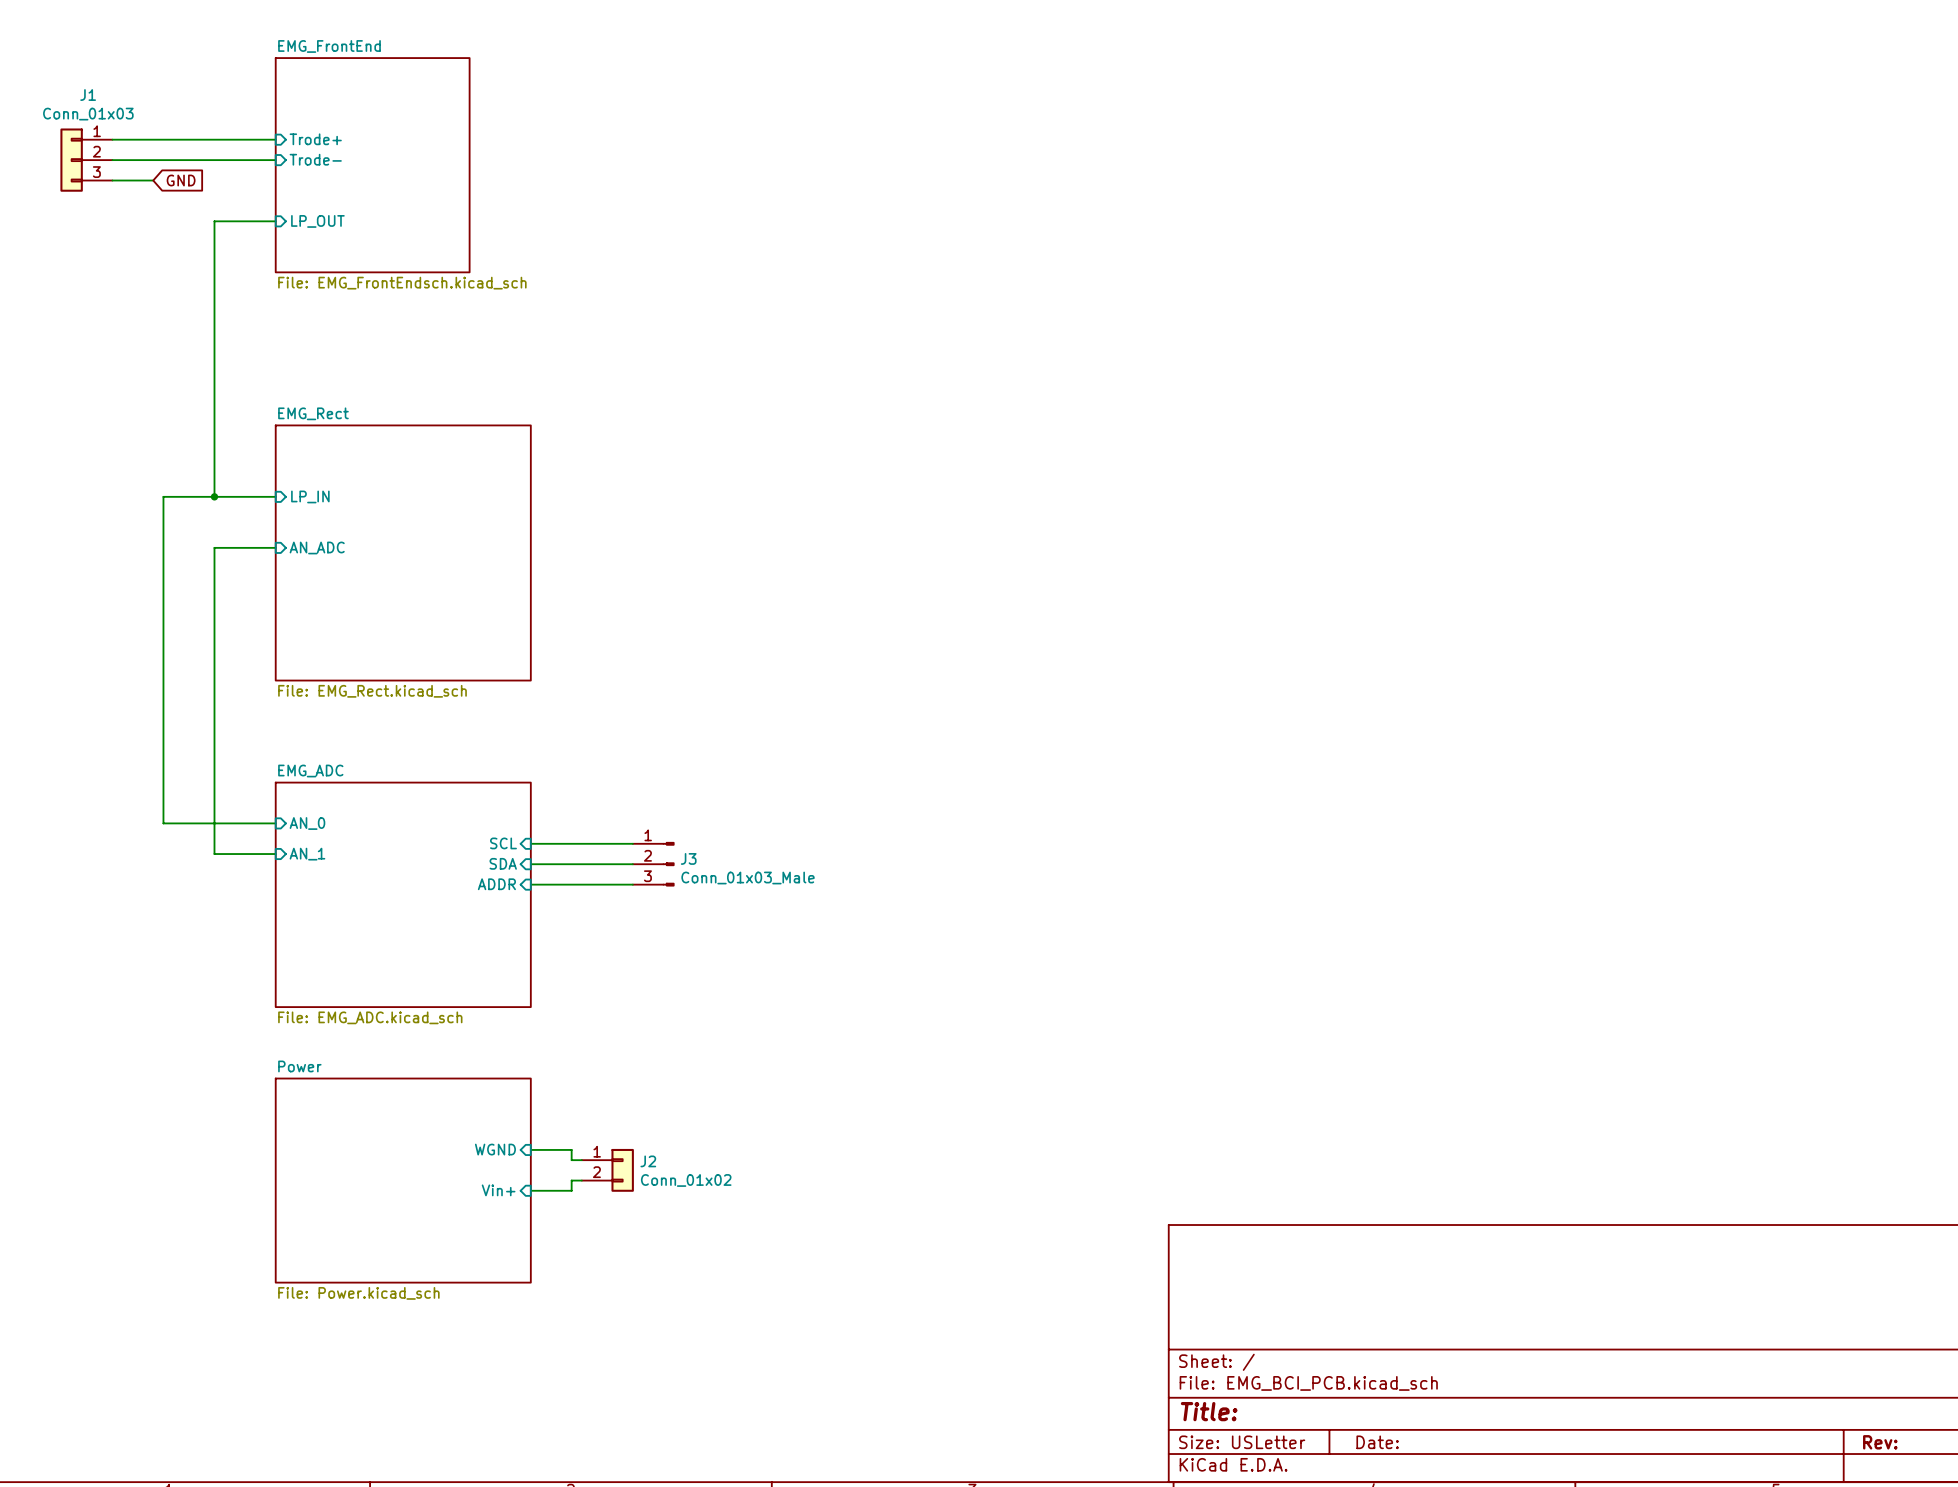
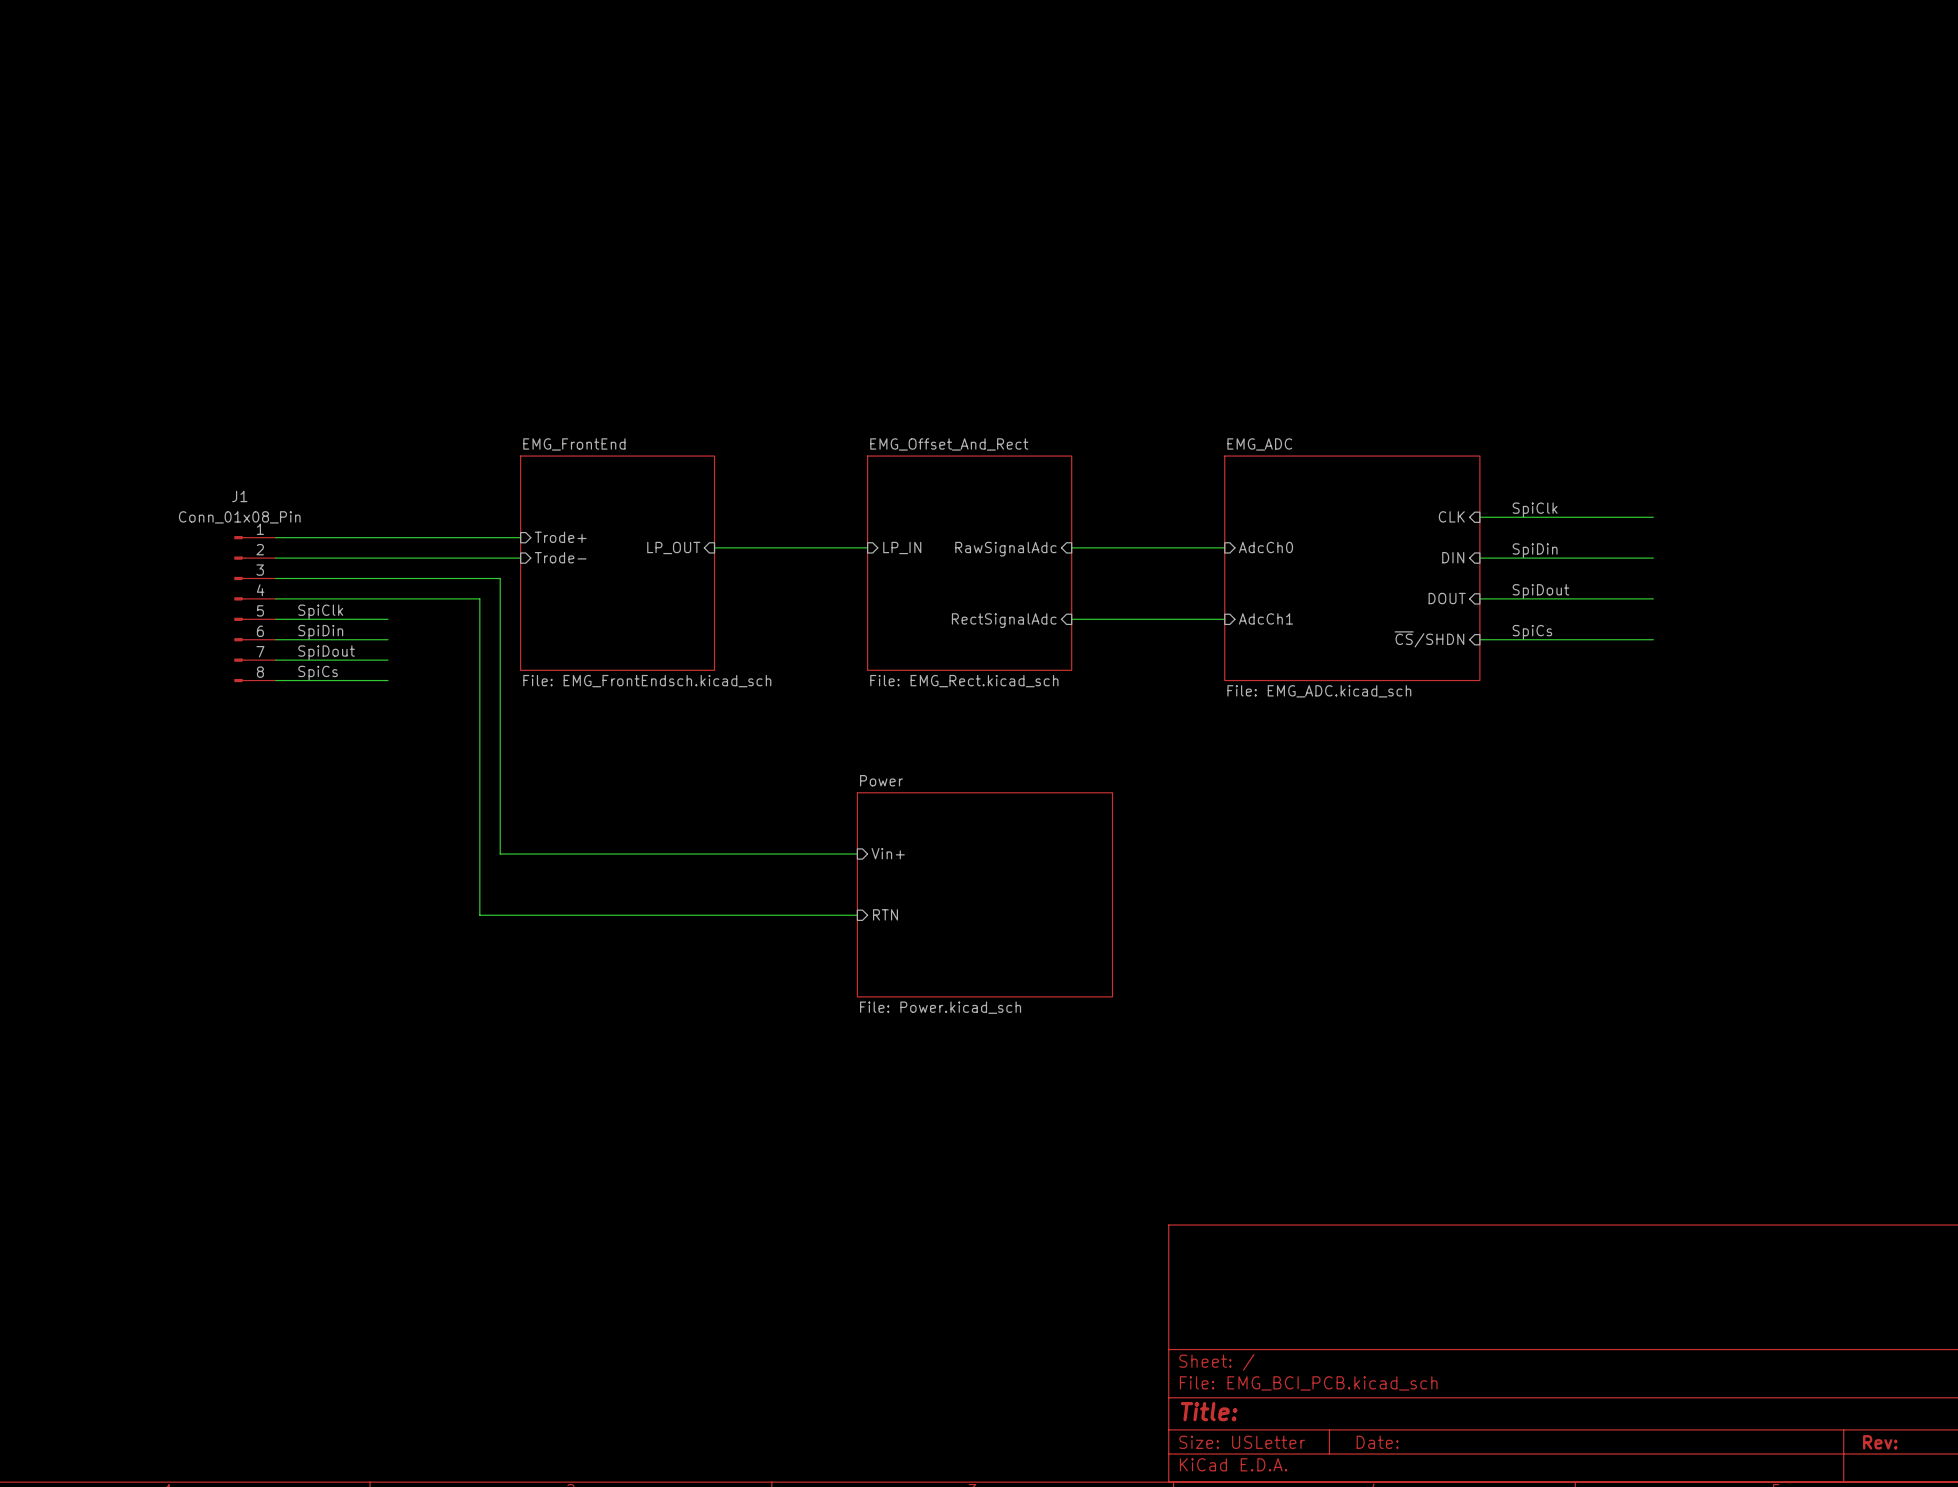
J1 name position: J1 (88, 95) -> J1 (239, 496)
J1 value: Conn_01x03 (88, 114) -> Conn_01x08_Pin (239, 517)
J1 symbol: [60, 128, 113, 192] -> [234, 536, 276, 683]
wire: (112, 139) (275, 139) -> none
sheet pin: Trode+ (315, 139) -> none
sheet pin: Trode- (315, 159) -> none
wire: (112, 160) (275, 160) -> none
sheet EMG_FrontEnd: File: EMG_FrontEndsch.kicad_sch (372, 165) -> none
wire: (112, 180) (153, 180) -> none
global label: GND (181, 180) -> none
wire: (275, 221) (214, 221) (214, 496) -> none
sheet pin: LP_OUT (317, 221) -> none
junction: (214, 496) -> none
wire: (275, 496) (163, 496) (163, 823) (275, 823) -> none
sheet pin: LP_IN (310, 496) -> none
label: none -> SpiClk (1535, 509)
sheet pin: none -> CLK (1451, 516)
wire: none -> (1479, 517) (1653, 517)
wire: none -> (275, 537) (520, 537)
sheet pin: none -> Trode+ (560, 537)
wire: (275, 547) (214, 547) (214, 854) (275, 854) -> none
sheet pin: AN_ADC (317, 547) -> none
sheet pin: none -> LP_OUT (673, 547)
wire: none -> (714, 547) (867, 547)
sheet pin: none -> LP_IN (902, 547)
wire: none -> (1071, 547) (1224, 547)
sheet pin: none -> AdcCh0 (1265, 547)
sheet pin: none -> RawSignalAdc (1005, 549)
label: none -> SpiDin (1535, 550)
sheet EMG_Rect: File: EMG_Rect.kicad_sch (403, 552) -> none
sheet pin: none -> Trode- (560, 557)
sheet pin: none -> DIN (1453, 557)
wire: none -> (275, 558) (520, 558)
wire: none -> (1479, 558) (1653, 558)
sheet EMG_FrontEnd: none -> File: EMG_FrontEndsch.kicad_sch (617, 563)
sheet EMG_Offset_And_Rect: none -> File: EMG_Rect.kicad_sch (969, 563)
sheet EMG_ADC: none -> File: EMG_ADC.kicad_sch (1352, 568)
wire: none -> (275, 578) (500, 578) (500, 854) (857, 854)
label: none -> SpiDout (1540, 591)
wire: none -> (275, 598) (479, 598) (479, 915) (857, 915)
sheet pin: none -> DOUT (1447, 598)
wire: none -> (1479, 598) (1653, 598)
label: none -> SpiClk (320, 611)
sheet pin: none -> AdcCh1 (1265, 618)
wire: none -> (275, 619) (387, 619)
wire: none -> (1071, 619) (1224, 619)
sheet pin: none -> RectSignalAdc (1004, 620)
label: none -> SpiDin (320, 632)
label: none -> SpiCs (1532, 632)
wire: none -> (275, 639) (387, 639)
sheet pin: none -> ~{CS}/SHDN (1429, 639)
wire: none -> (1479, 639) (1653, 639)
label: none -> SpiDout (326, 652)
wire: none -> (275, 660) (387, 660)
label: none -> SpiCs (318, 673)
sheet pin: AN_0 (307, 823) -> none
sheet pin: SCL (503, 843) -> none
wire: (530, 843) (632, 843) -> none
sheet pin: none -> Vin+ (888, 853)
sheet pin: AN_1 (307, 854) -> none
sheet pin: SDA (503, 863) -> none
wire: (530, 864) (632, 864) -> none
J3: Conn_01x03_Male (653, 864) -> none
sheet pin: ADDR (496, 884) -> none
wire: (530, 884) (632, 884) -> none
sheet EMG_ADC: File: EMG_ADC.kicad_sch (403, 894) -> none
sheet Power: none -> File: Power.kicad_sch (984, 894)
sheet pin: none -> RTN (885, 914)
sheet pin: WGND (495, 1149) -> none
wire: (530, 1149) (571, 1149) (571, 1160) (581, 1160) -> none
J2: Conn_01x02 (607, 1170) -> none
sheet Power: File: Power.kicad_sch (403, 1180) -> none
wire: (581, 1180) (571, 1180) (571, 1190) (530, 1190) -> none
sheet pin: Vin+ (498, 1190) -> none

